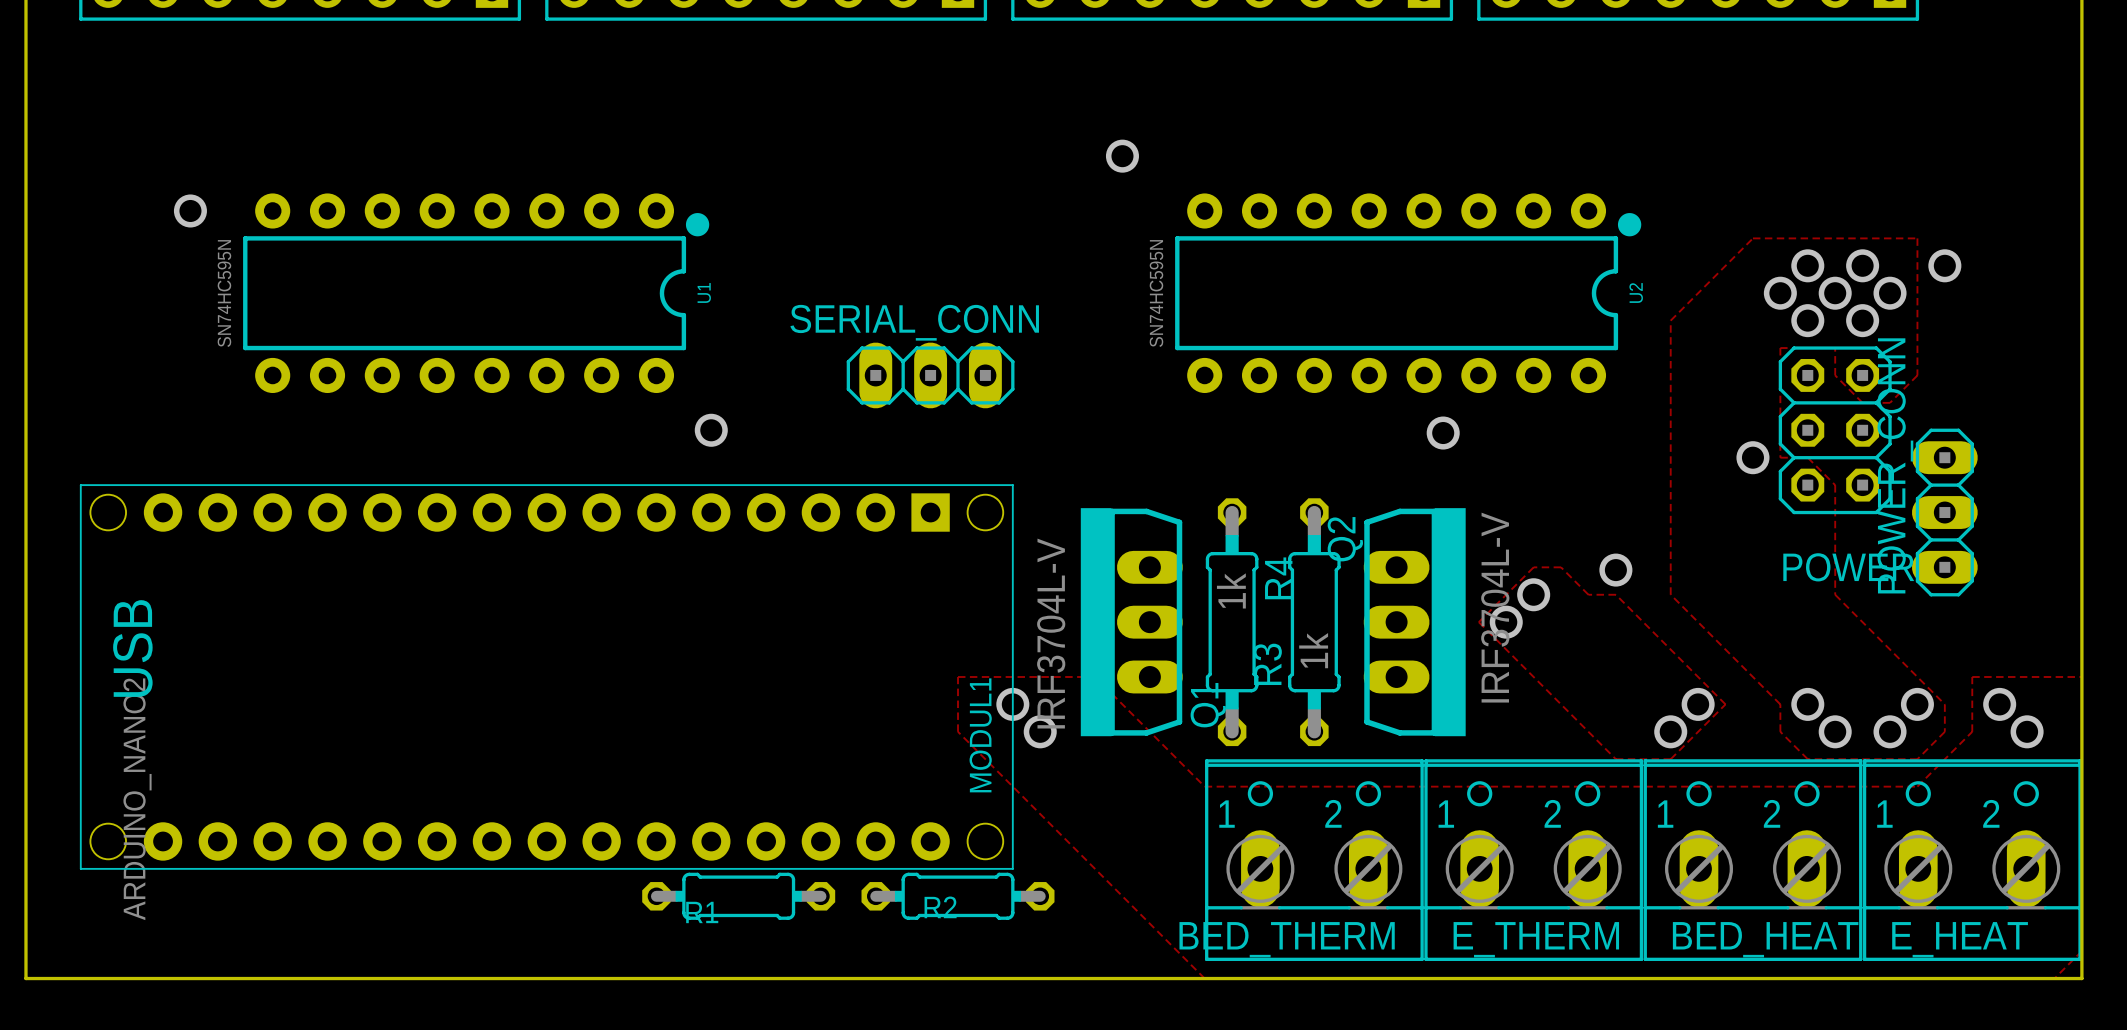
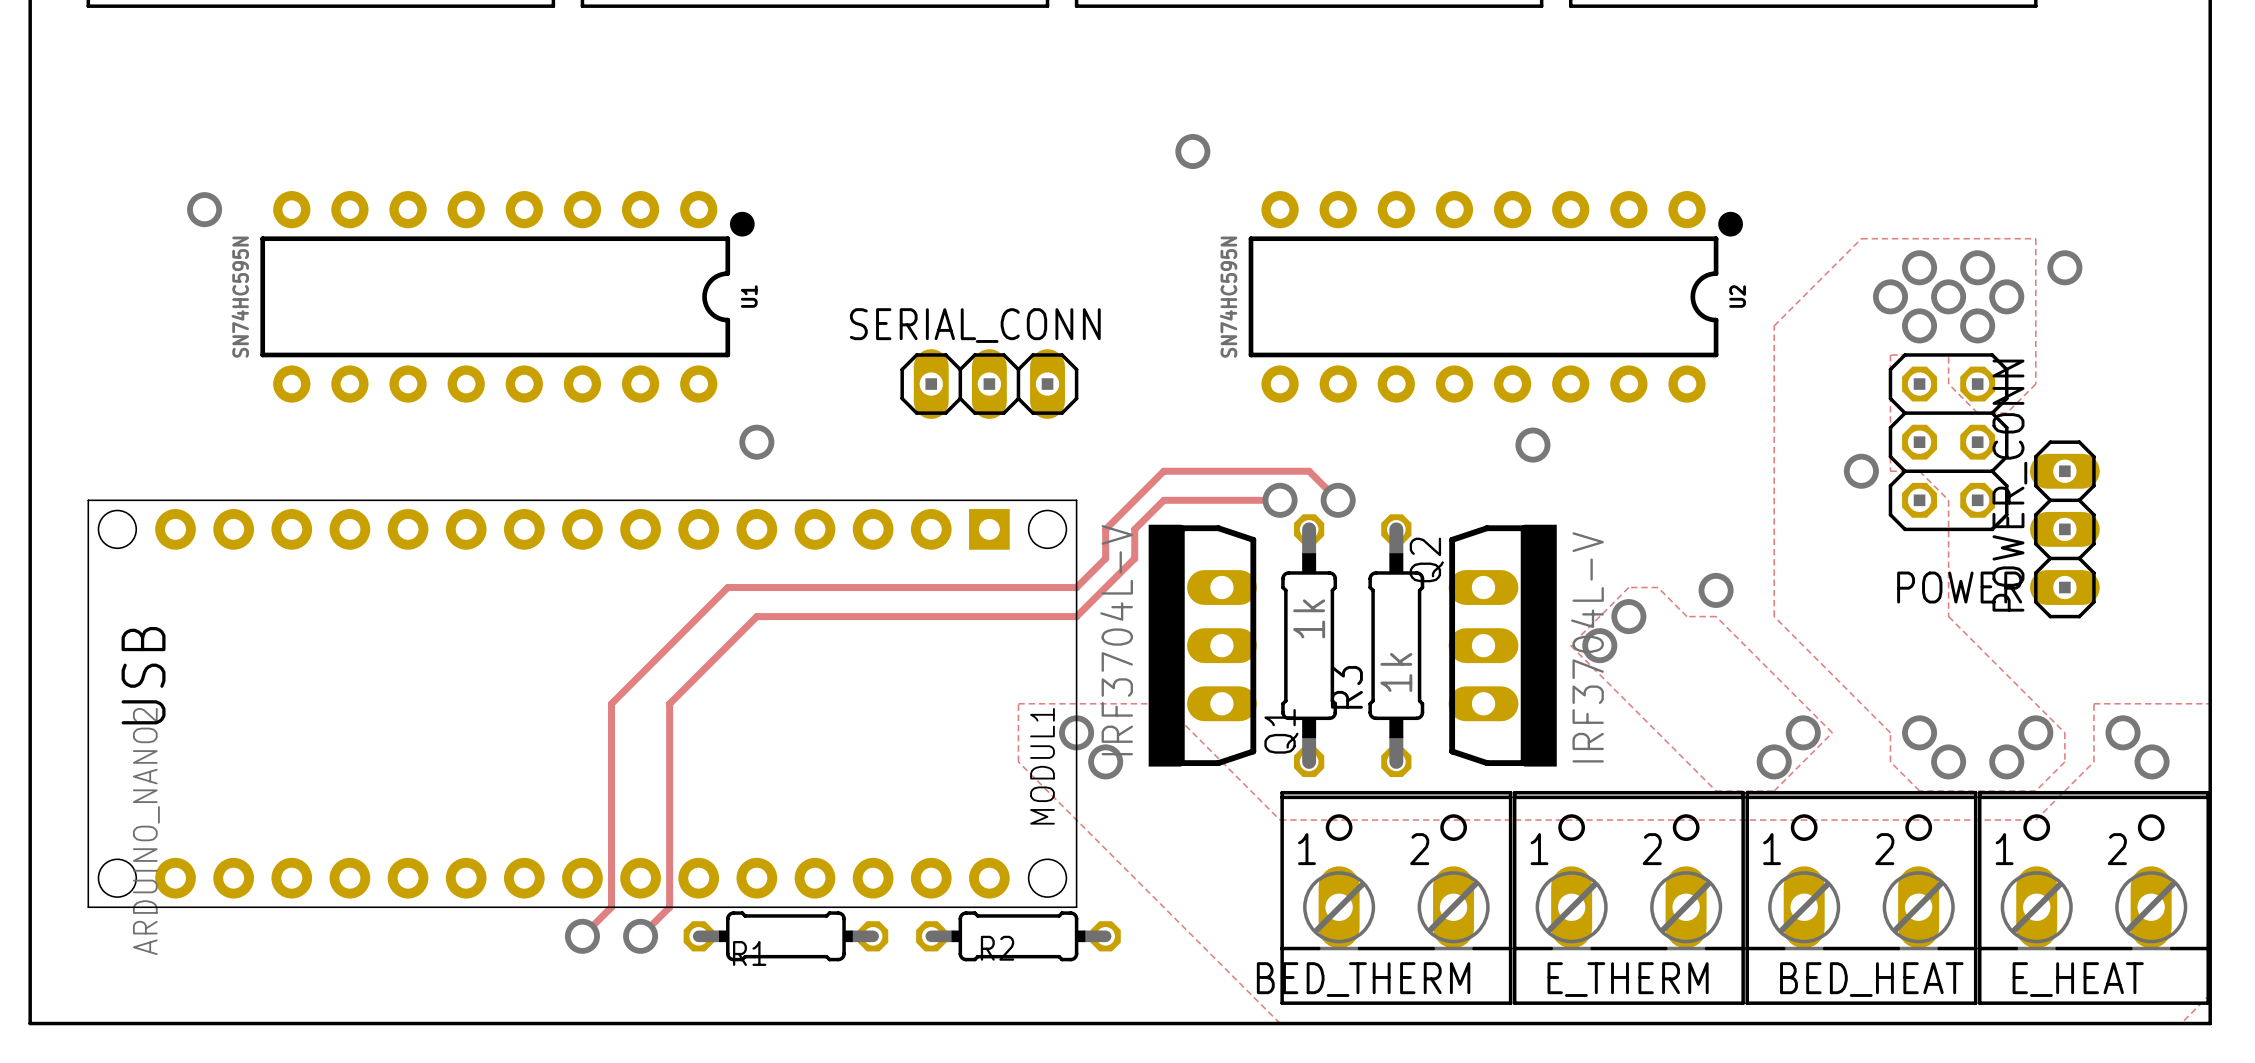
track: none -> (1280, 500) (1163, 500) (1134, 529) (1134, 558) (1076, 616) (756, 616) (669, 703) (669, 907) (640, 936)
via: none -> (1280, 500)
track: none -> (1338, 500) (1309, 471) (1163, 471) (1105, 529) (1105, 558) (1076, 587) (727, 587) (611, 703) (611, 907) (582, 936)
via: none -> (1338, 500)
R4 name: R4 (1278, 578) -> none
via: none -> (582, 936)
via: none -> (640, 936)

